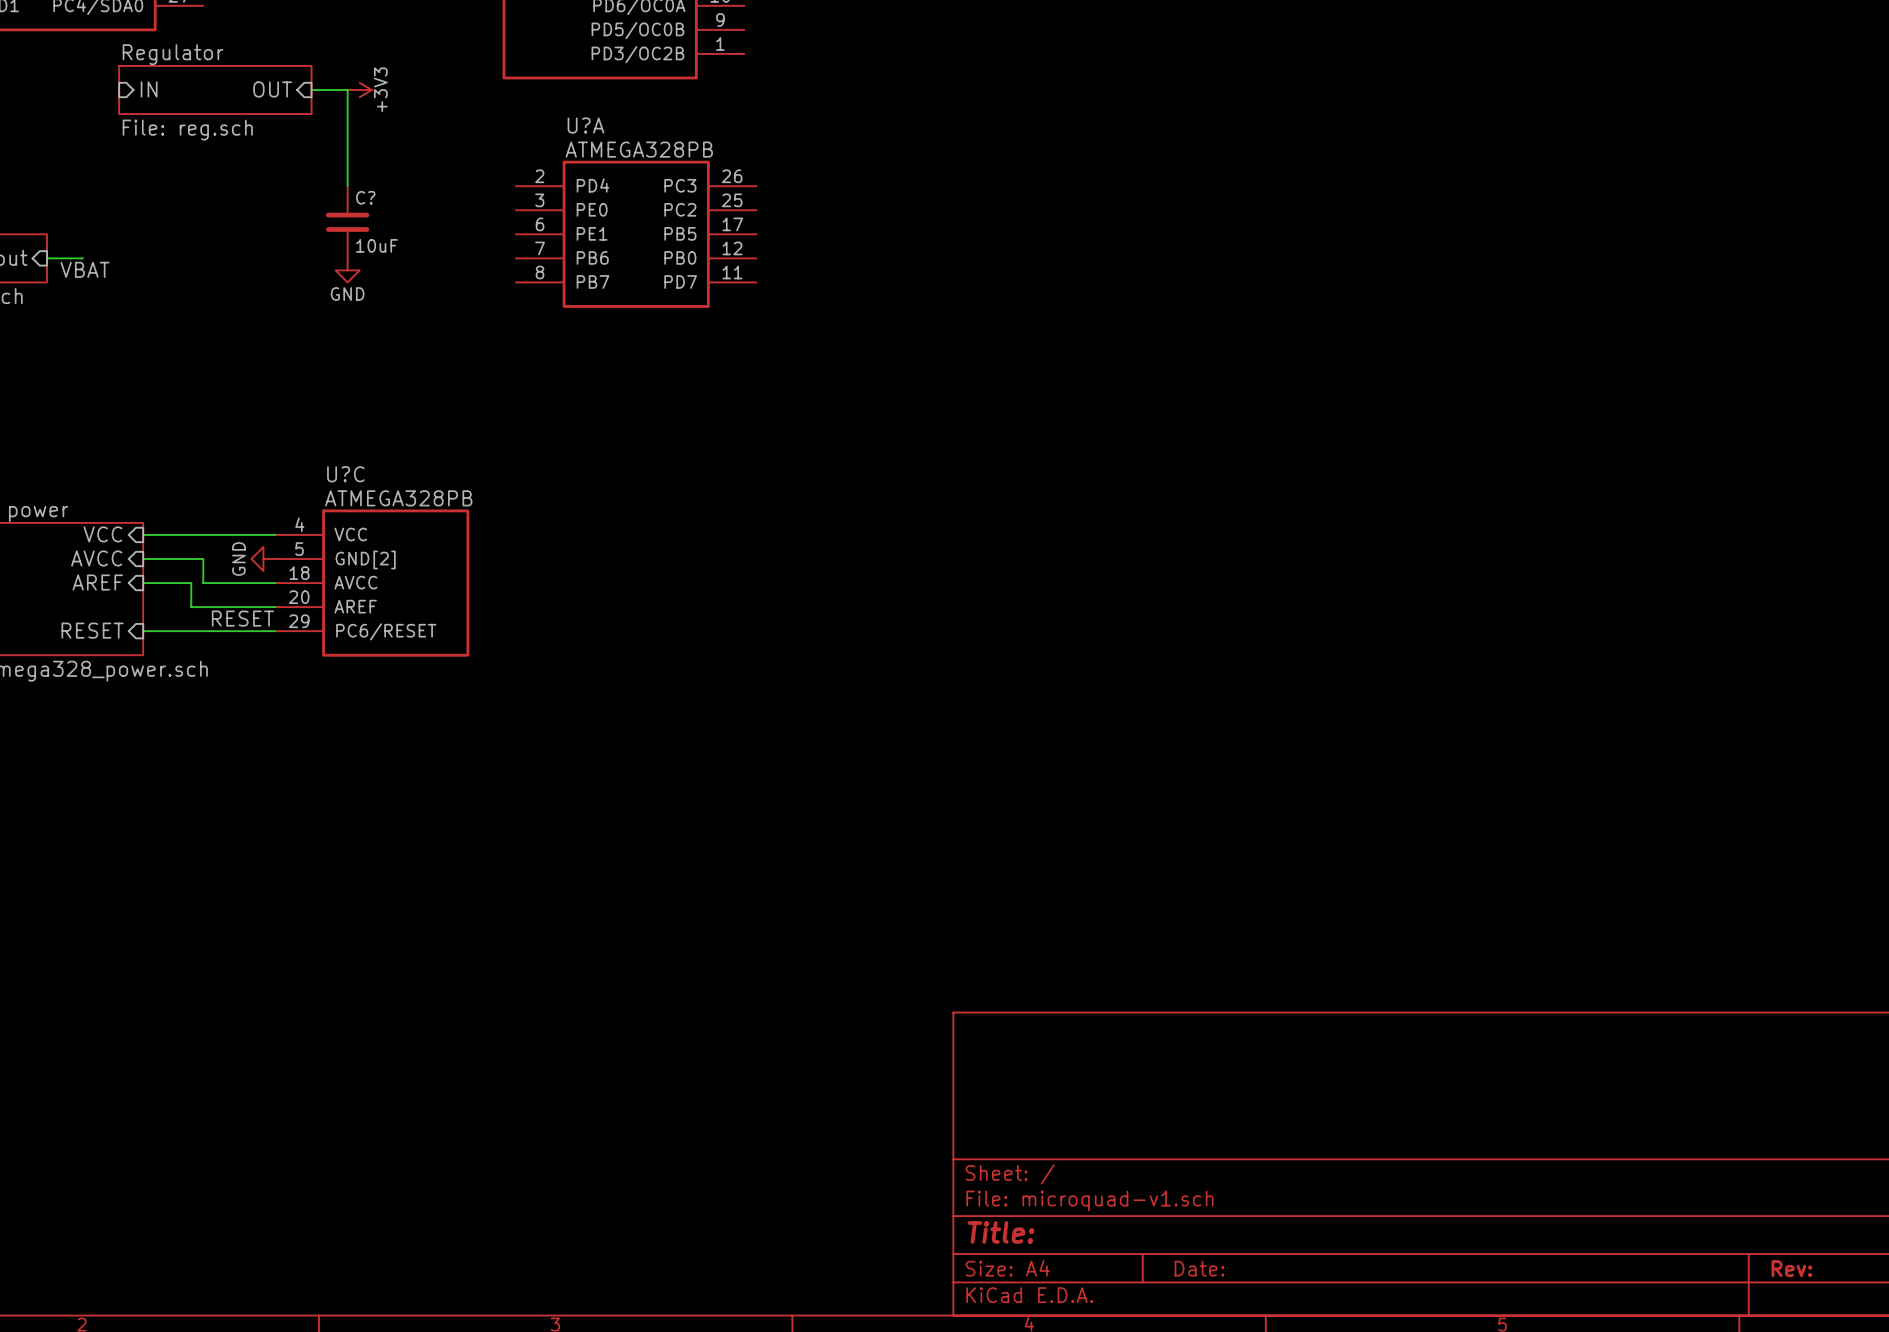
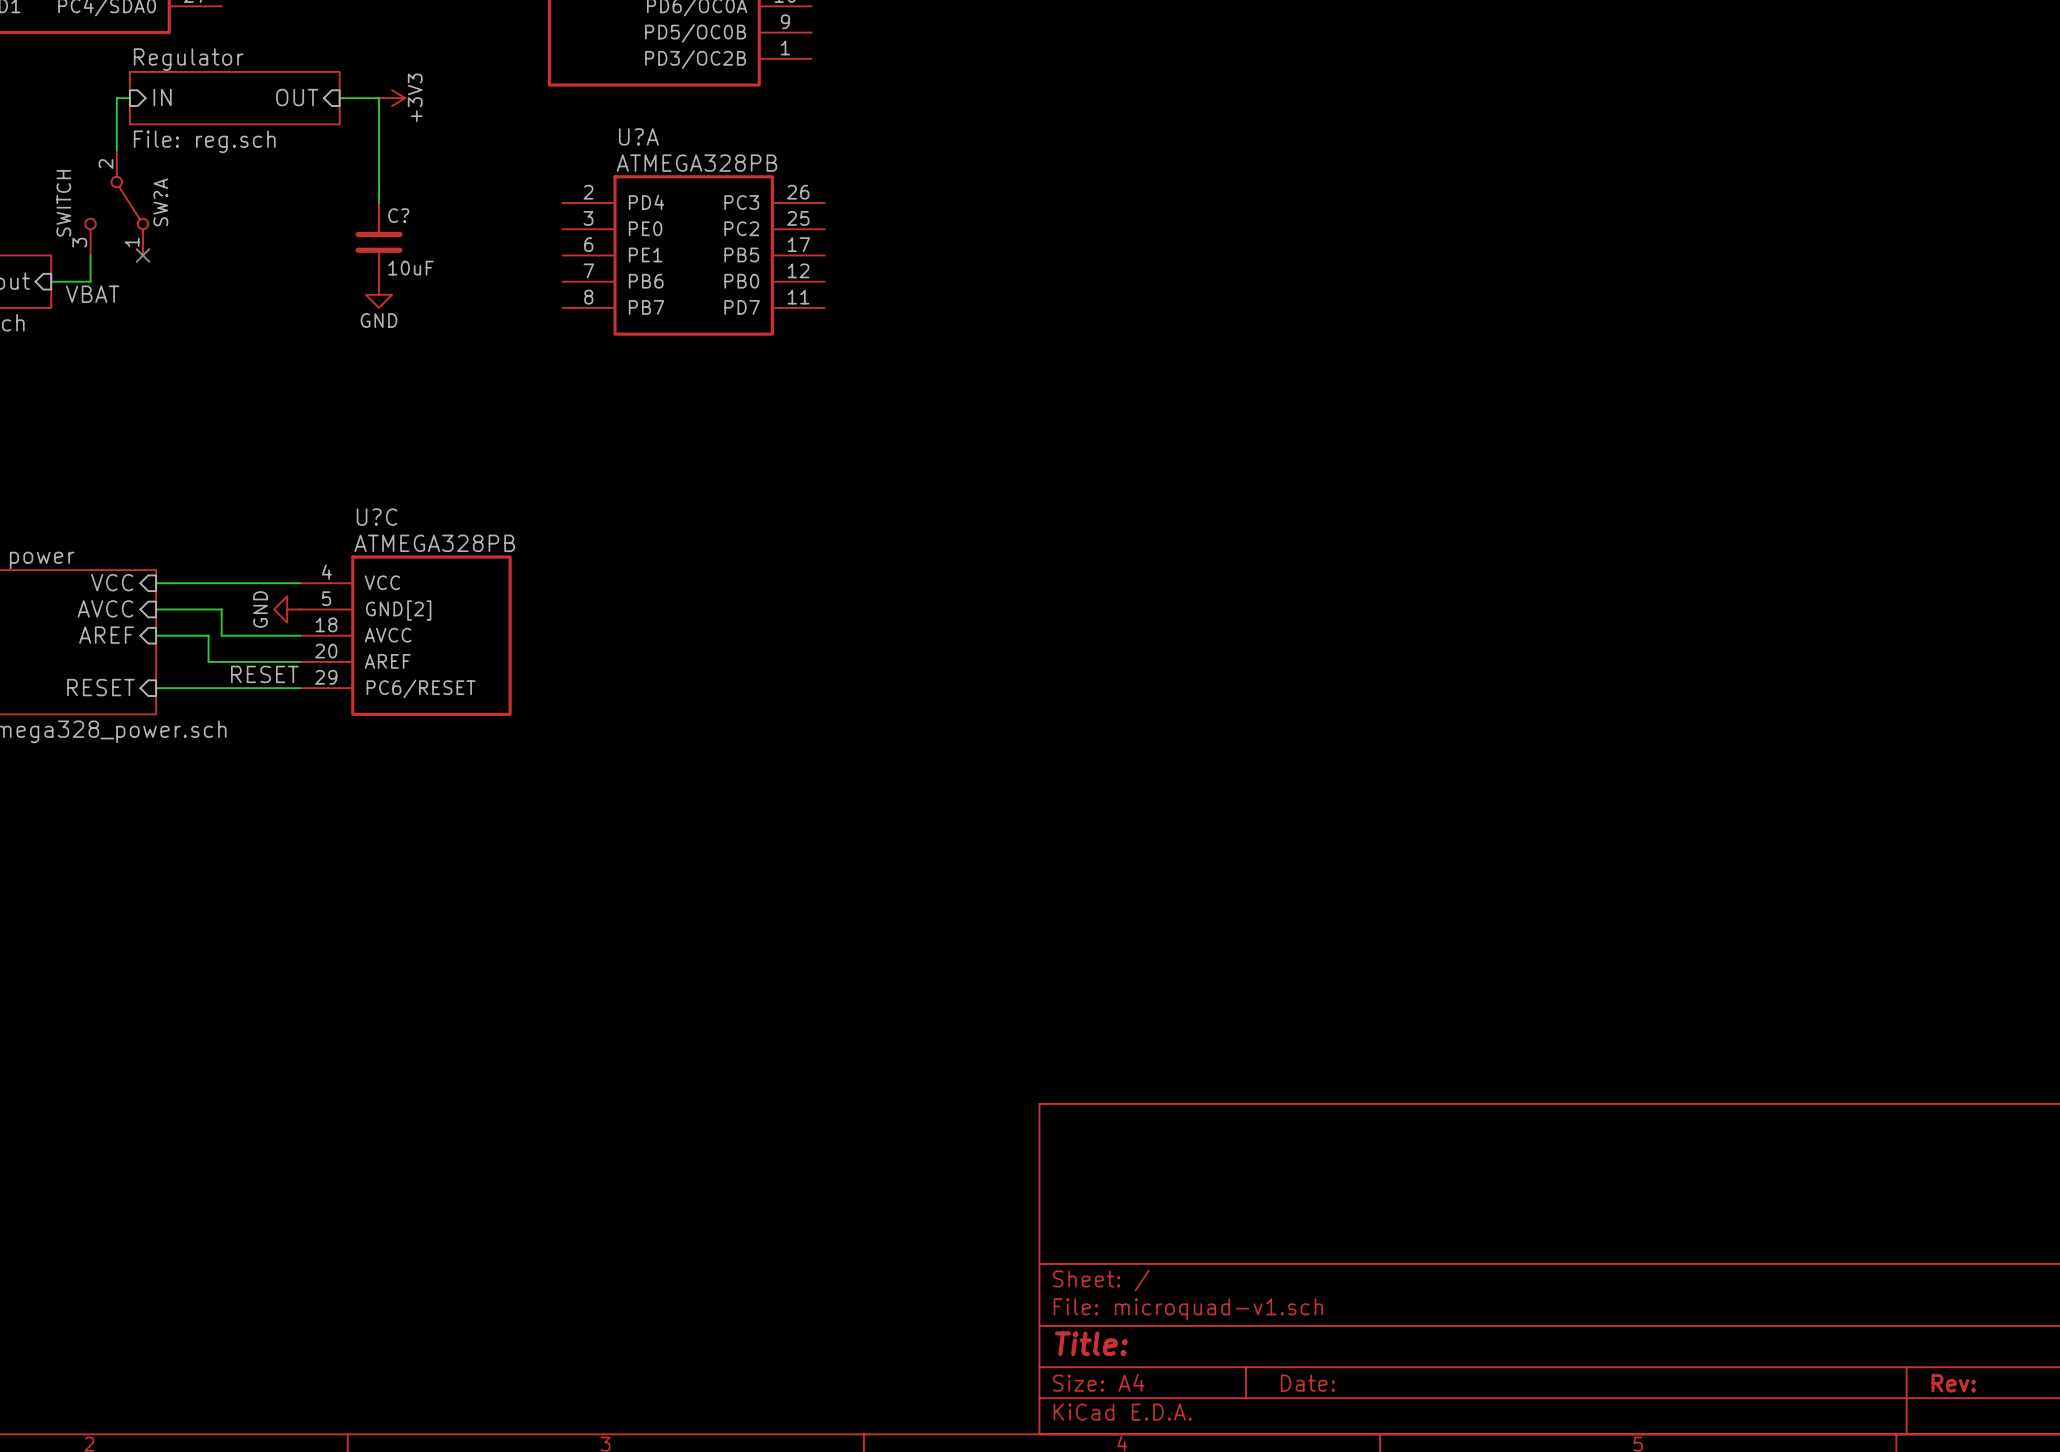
wire: none -> (129, 98) (116, 98) (116, 150)
SW?A: none -> SWITCH (116, 203)
wire: none -> (90, 255) (90, 281)
no-connect mark: none -> (143, 255)

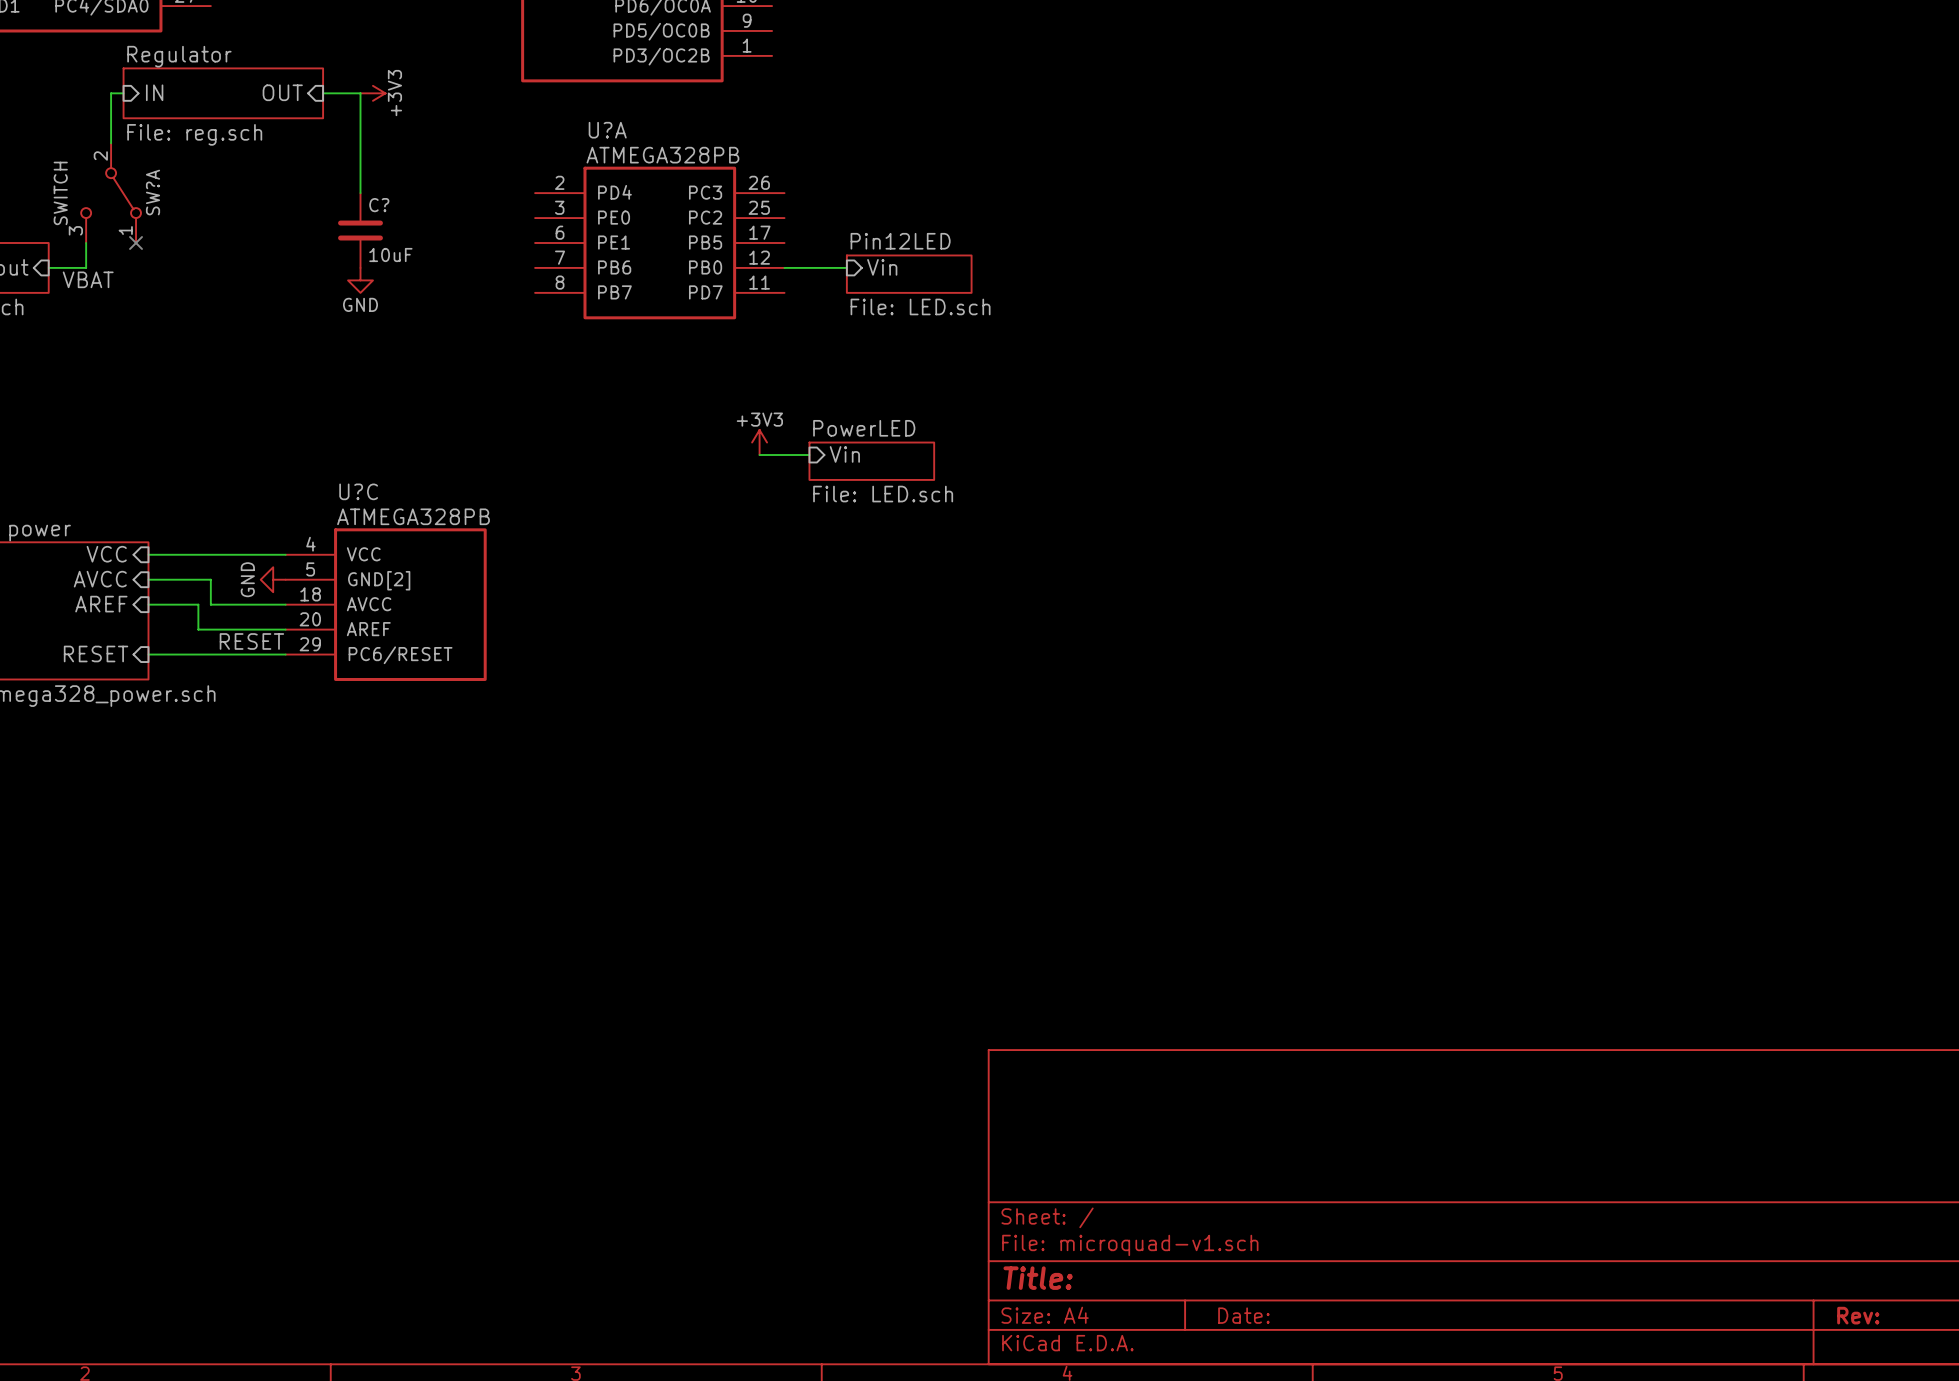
wire: none -> (784, 267) (846, 267)
sheet pin: none -> Vin (882, 267)
sheet Pin12LED: none -> File: LED.sch (909, 274)
power symbol: none -> +3V3 (759, 442)
sheet pin: none -> Vin (844, 454)
wire: none -> (759, 455) (809, 455)
sheet PowerLED: none -> File: LED.sch (871, 461)

